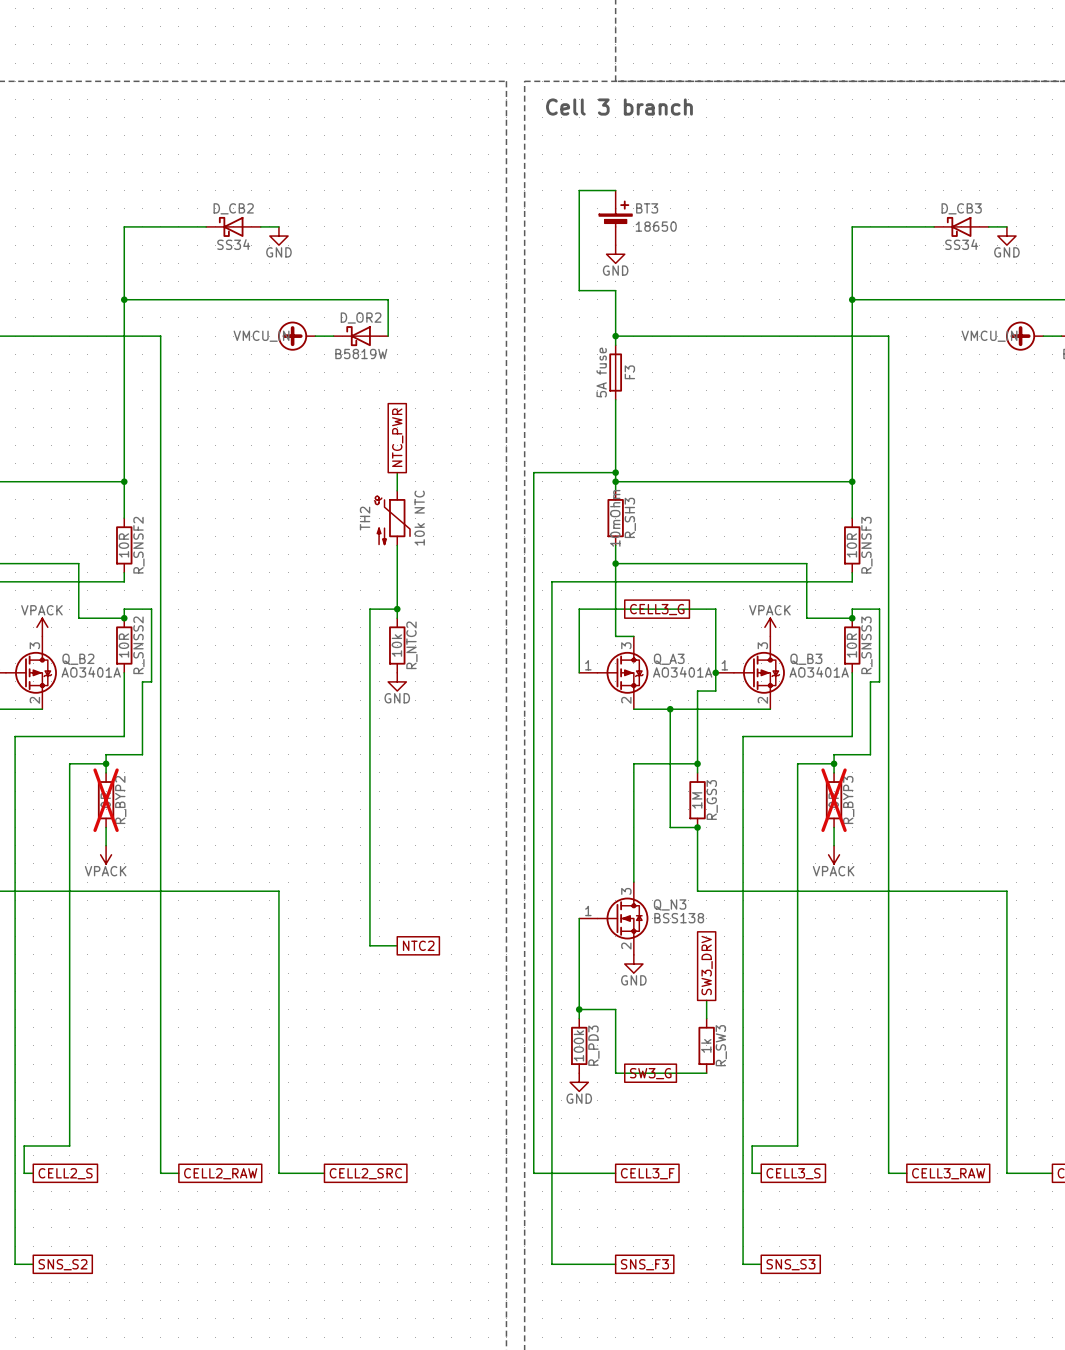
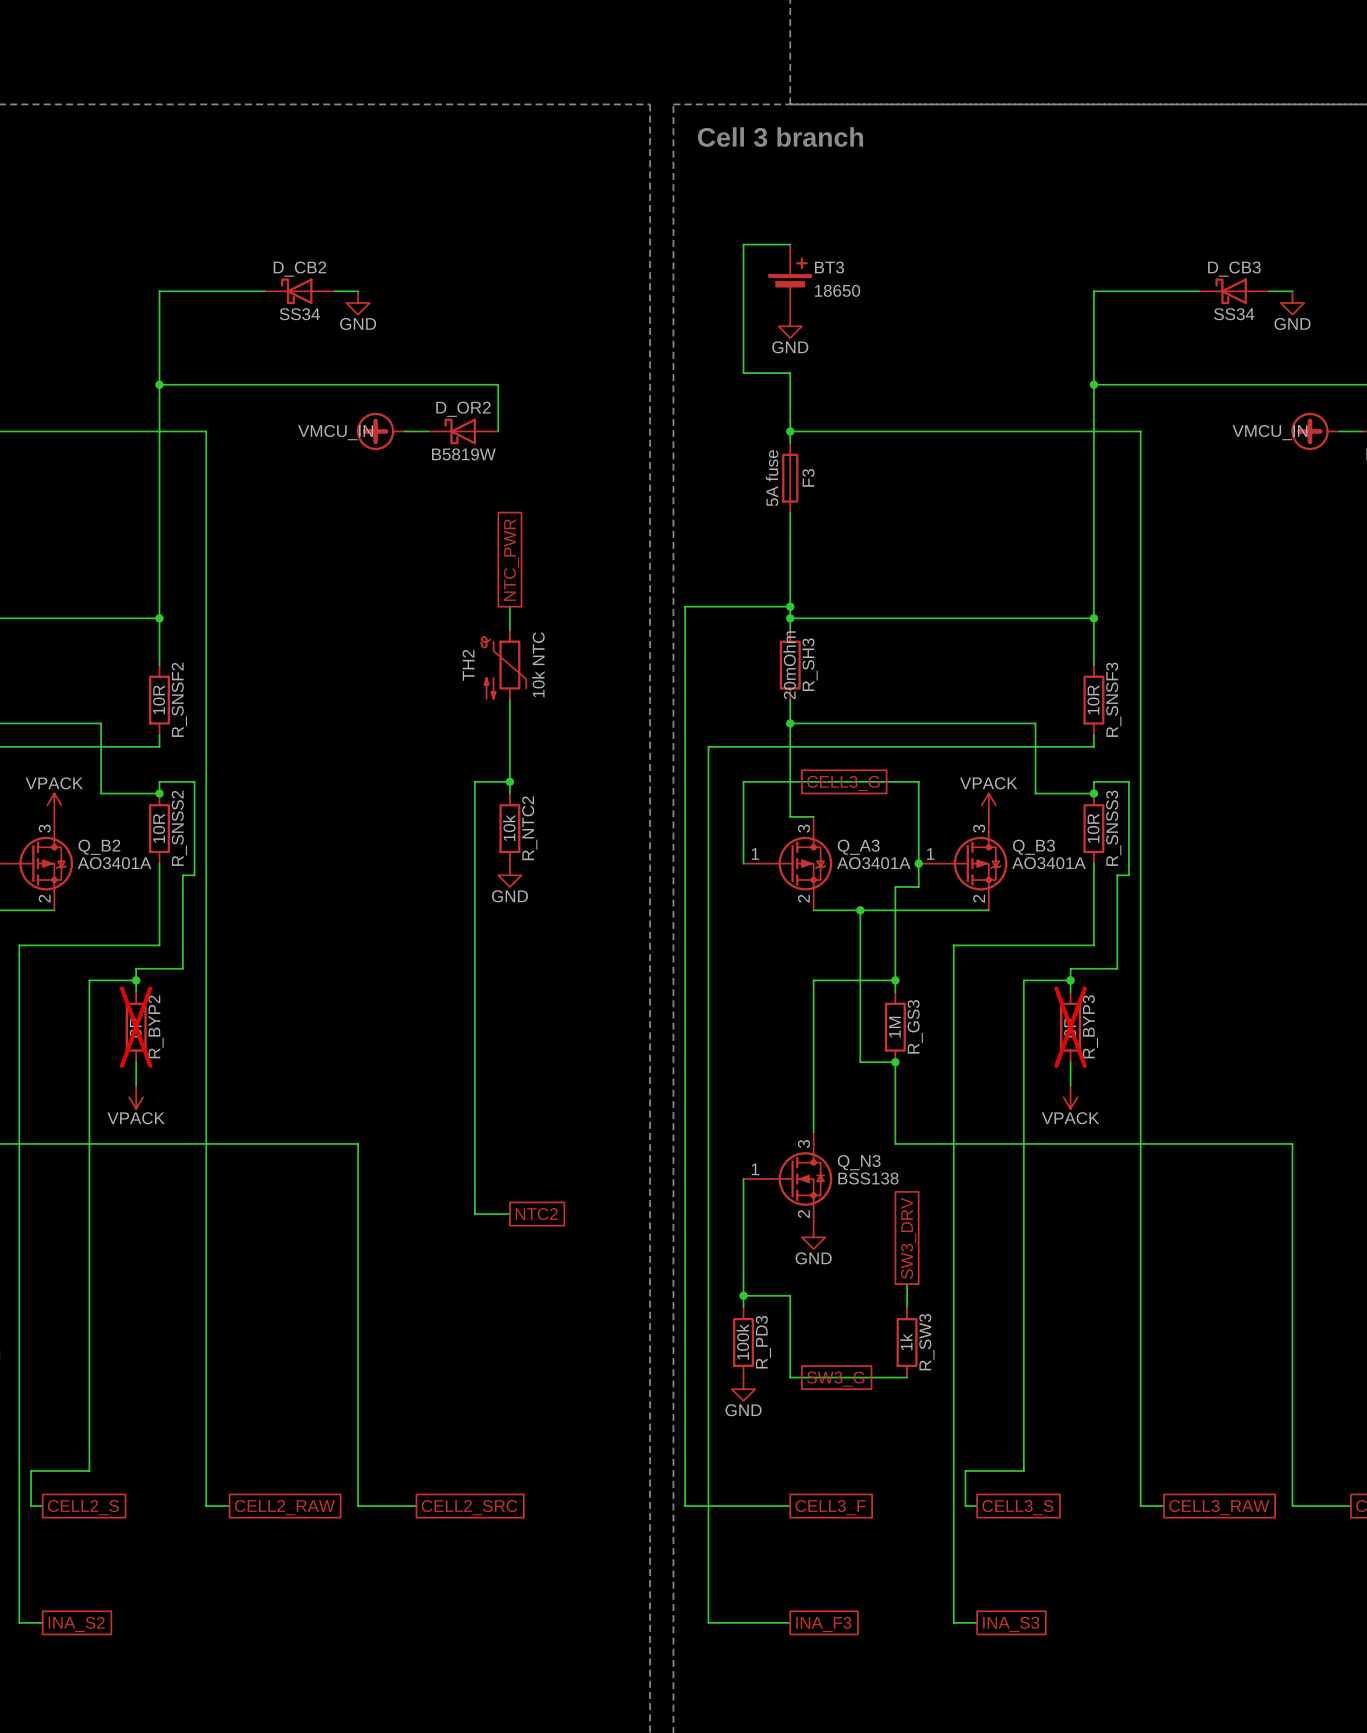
R_SH3 value: 10mOhm (615, 518) -> 20mOhm (789, 665)
global label: SNS_S2 (62, 1264) -> INA_S2 (76, 1624)
global label: SNS_F3 (644, 1264) -> INA_F3 (823, 1624)
global label: SNS_S3 (790, 1264) -> INA_S3 (1011, 1624)

